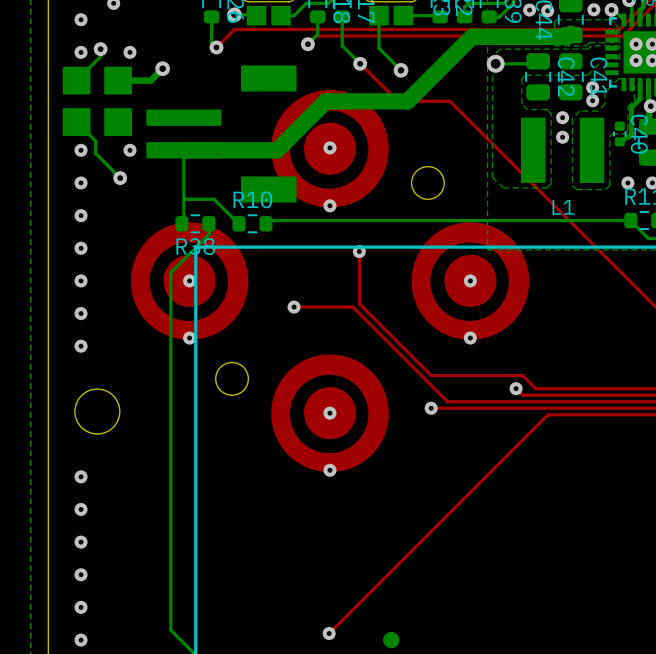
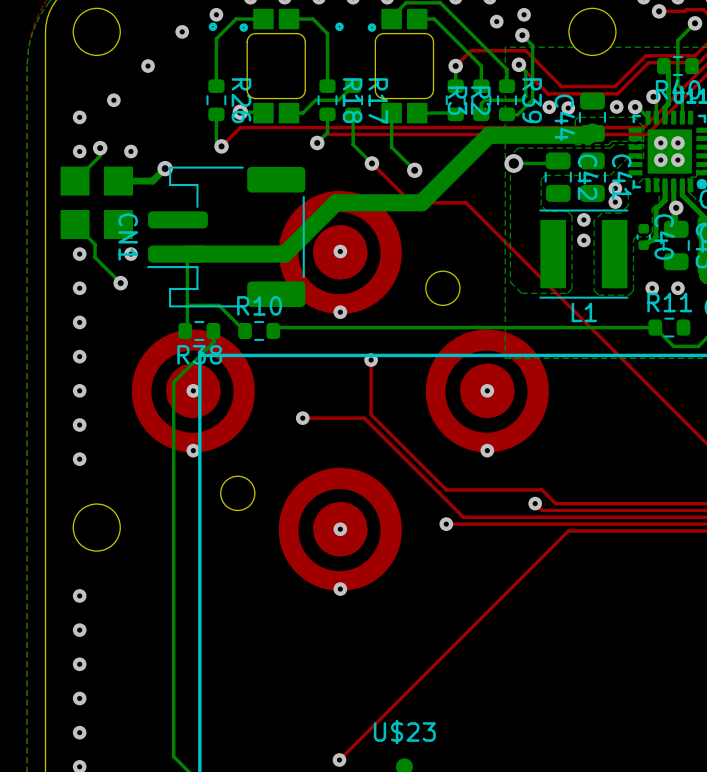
L1 footprint: [520, 117, 605, 183] -> [539, 209, 629, 299]
CN1: none -> (226, 236)
part: (221, 134) -> none
U$23 name: none -> U$23 (404, 732)

